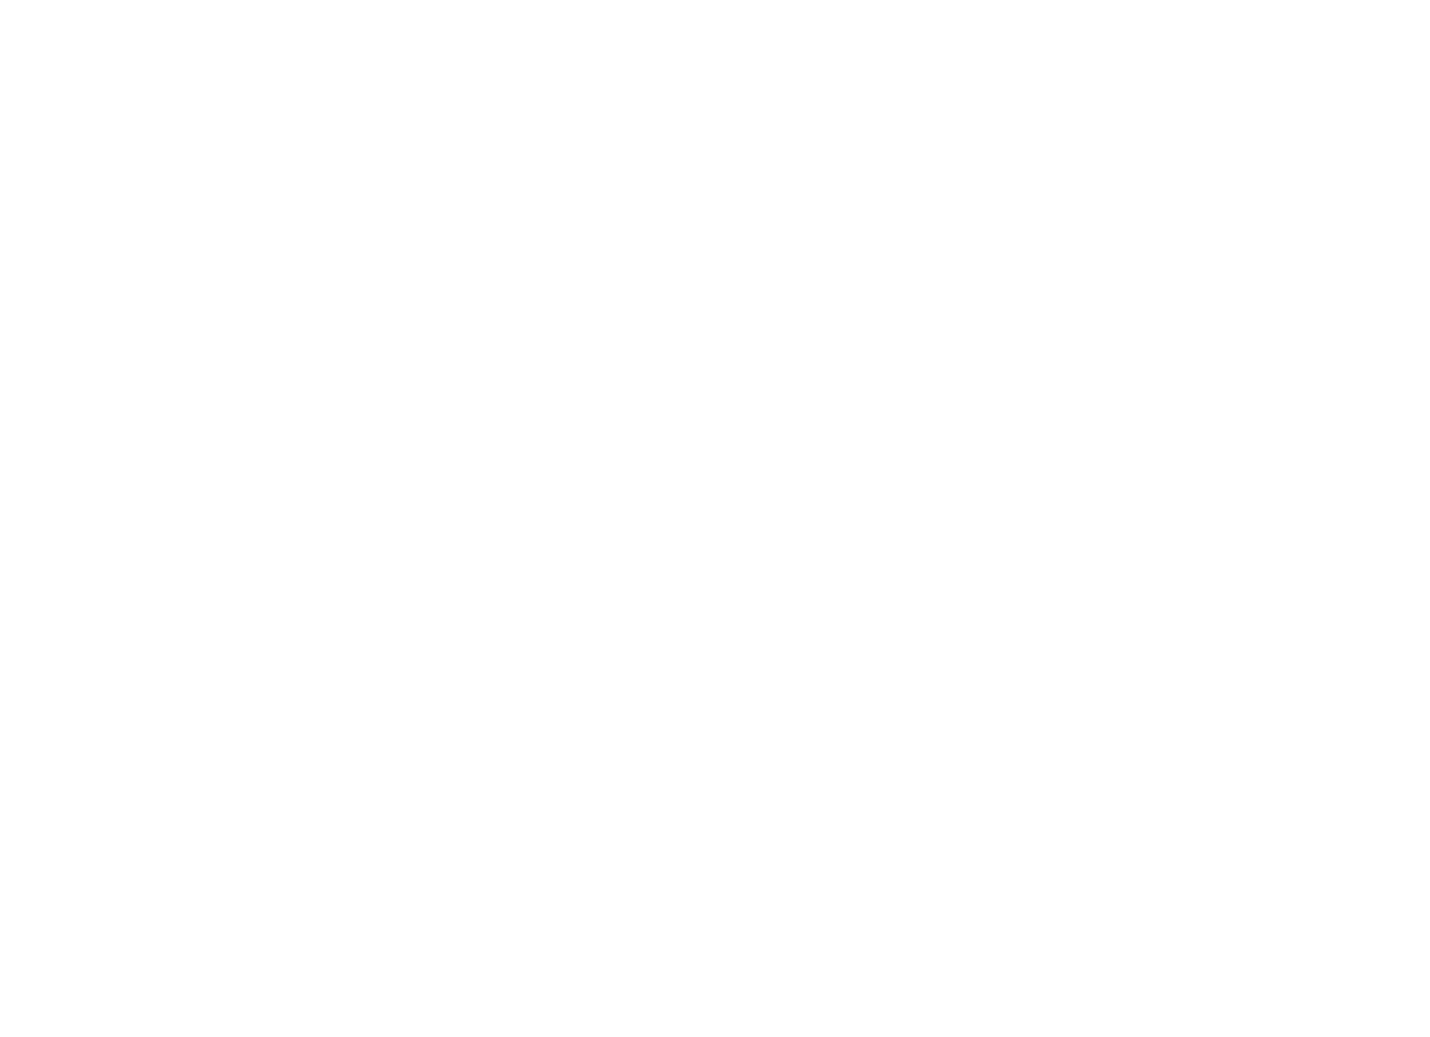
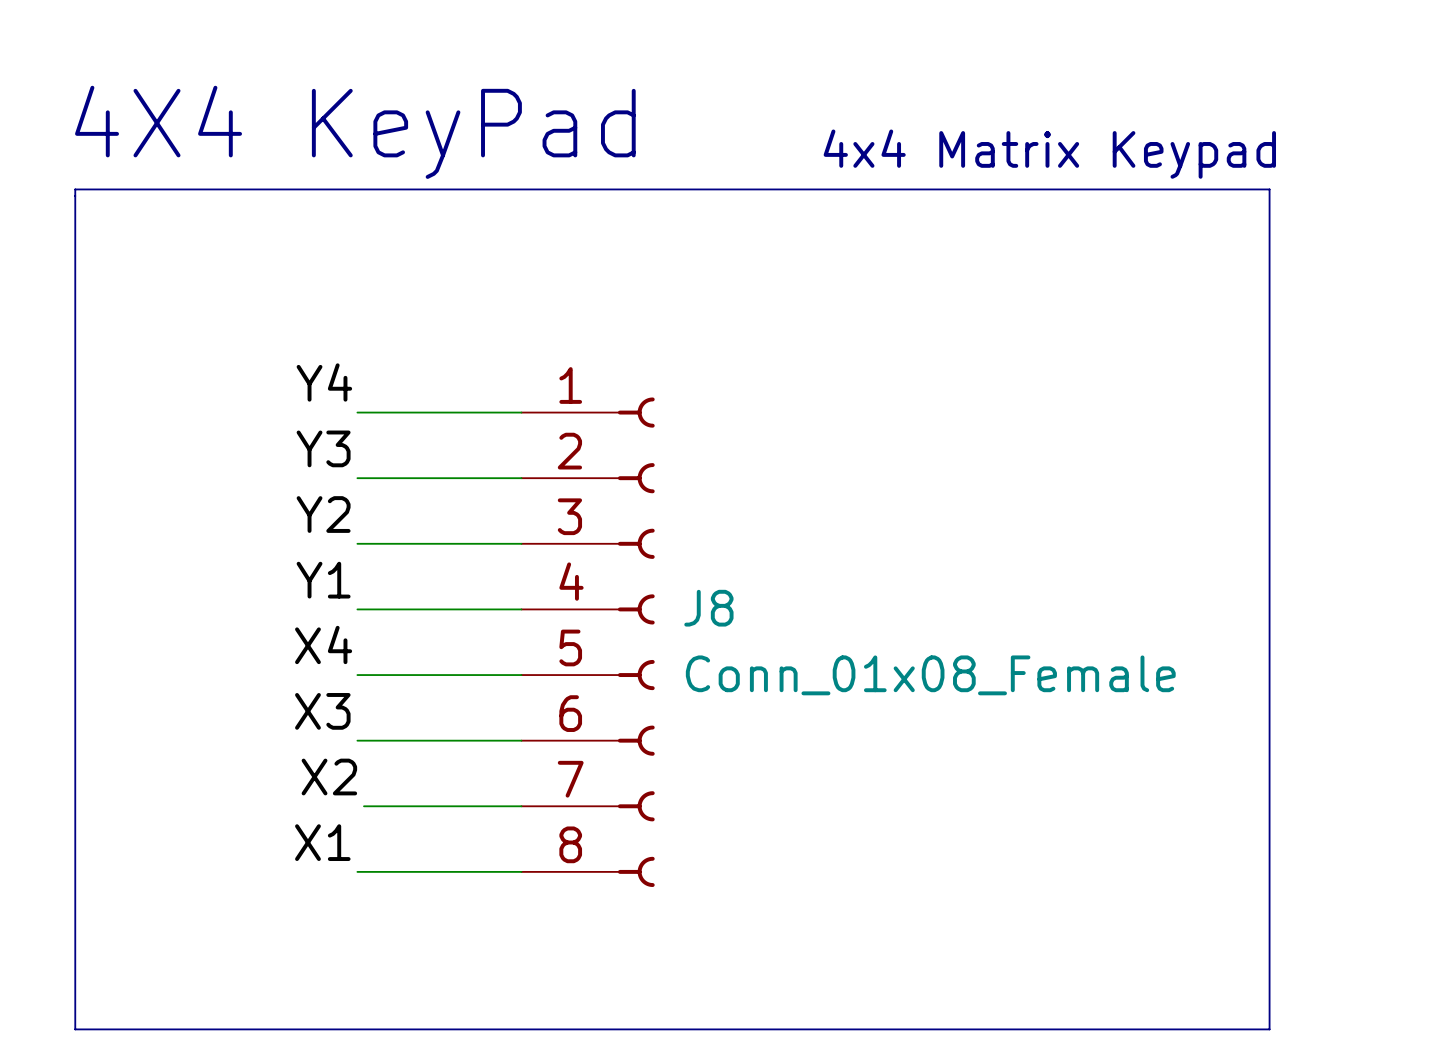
text: none -> 4X4 KeyPad (355, 132)
text: none -> 4x4 Matrix Keypad (1049, 154)
line: none -> (75, 189) (1269, 189) (1269, 1029) (75, 1029) (75, 189)
label: none -> Y4 (324, 382)
wire: none -> (357, 412) (521, 412)
label: none -> Y3 (323, 448)
wire: none -> (357, 478) (521, 478)
label: none -> Y2 (323, 514)
wire: none -> (357, 543) (521, 543)
label: none -> Y1 (323, 580)
wire: none -> (357, 609) (521, 609)
J8: none -> Conn_01x08_Female (588, 642)
label: none -> X4 (323, 644)
wire: none -> (357, 675) (521, 675)
label: none -> X3 (322, 711)
wire: none -> (357, 740) (521, 740)
label: none -> X2 (329, 777)
wire: none -> (363, 806) (521, 806)
label: none -> X1 (322, 842)
wire: none -> (357, 871) (521, 871)

